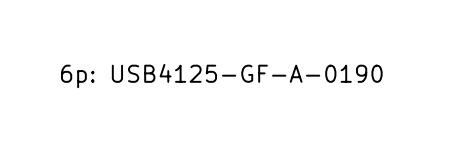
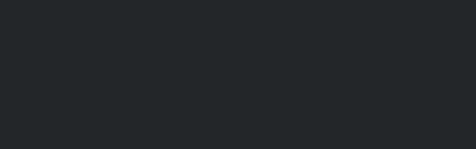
text: 6p: USB4125-GF-A-0190 (221, 76) -> none

